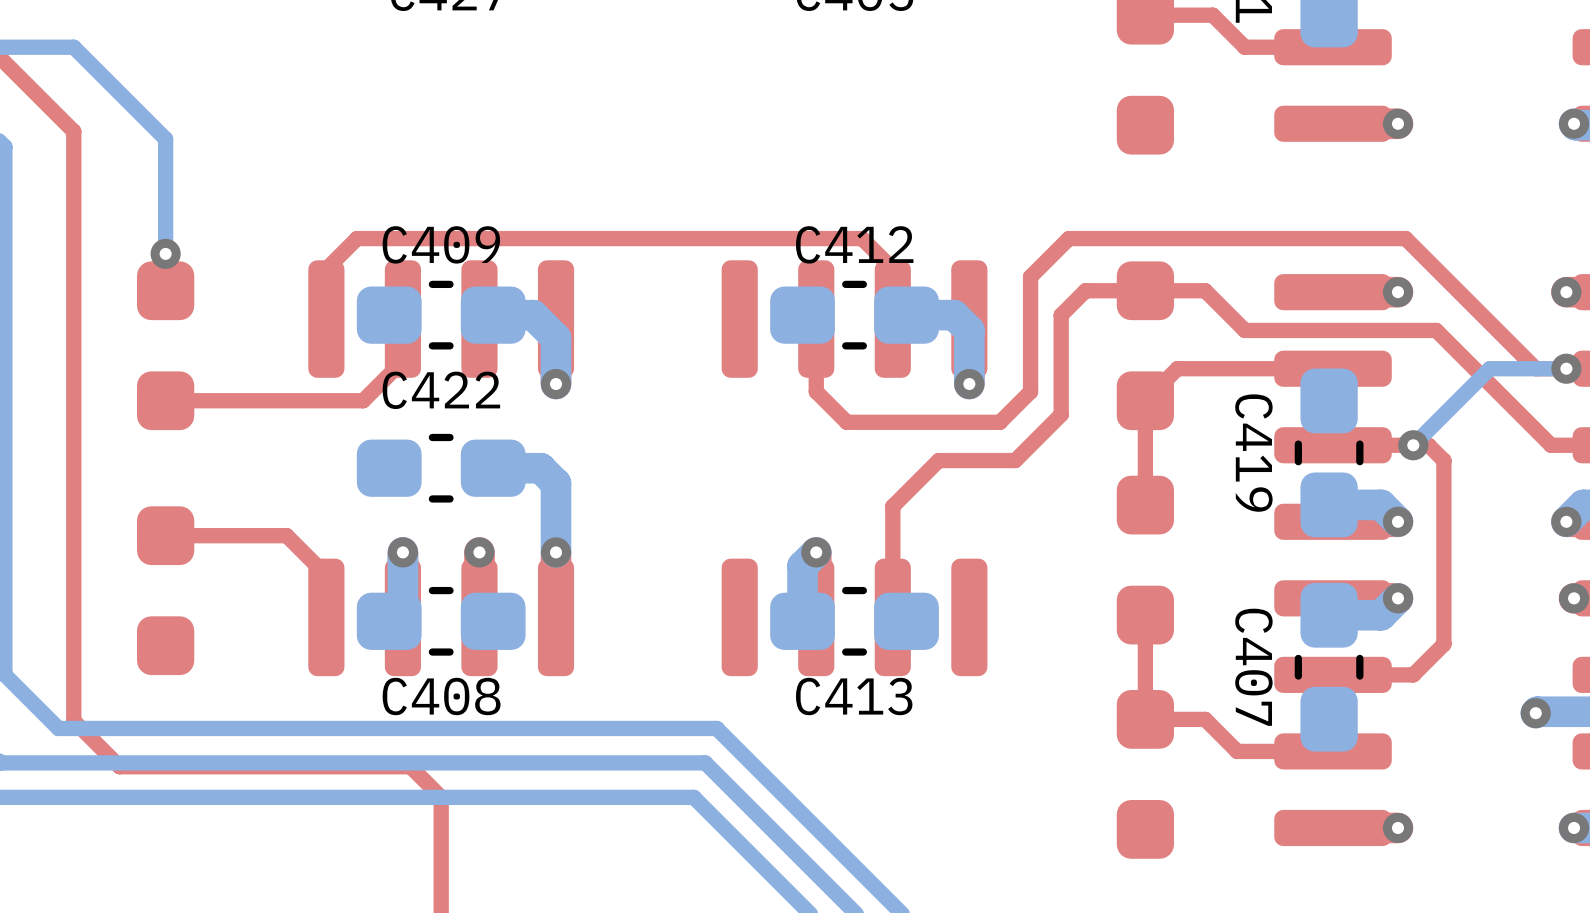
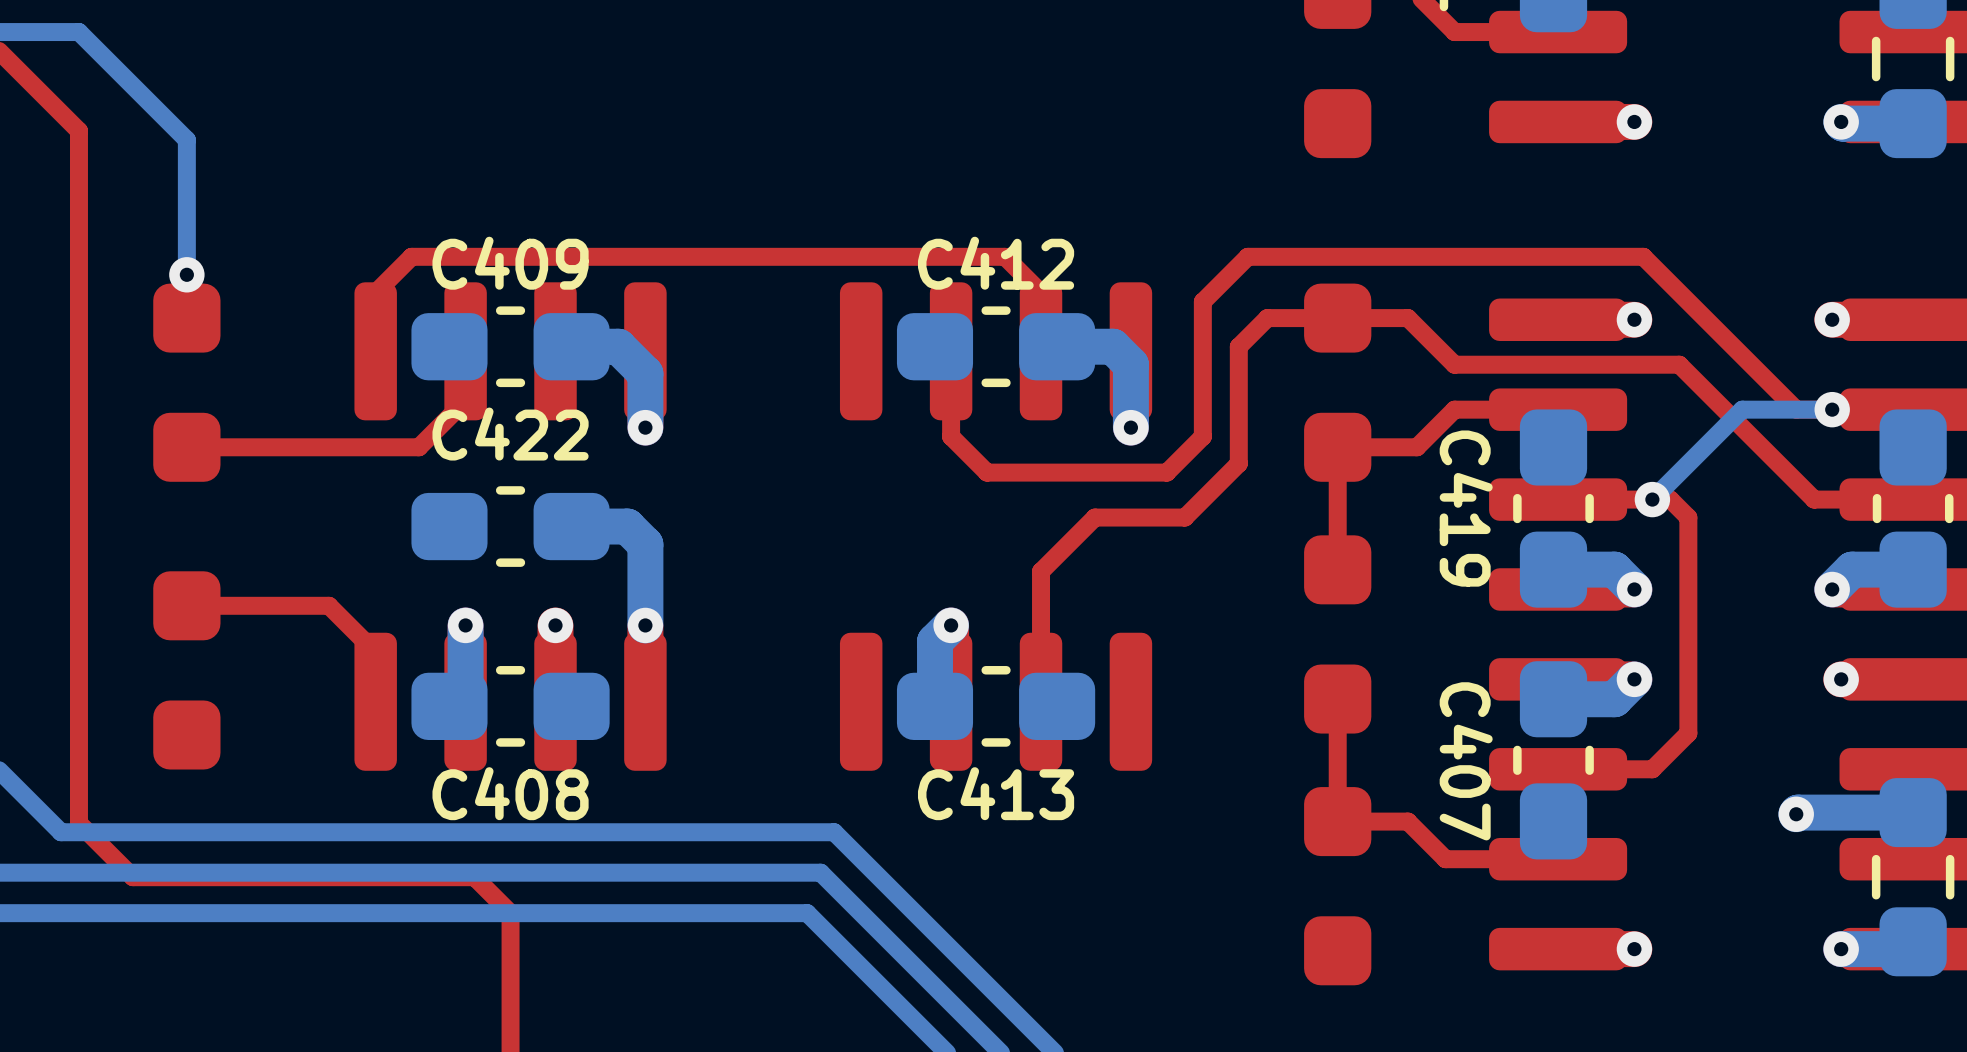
top track: (1244, 368) (1177, 368) (1145, 400) -> (1454, 409) (1416, 447) (1337, 447)

